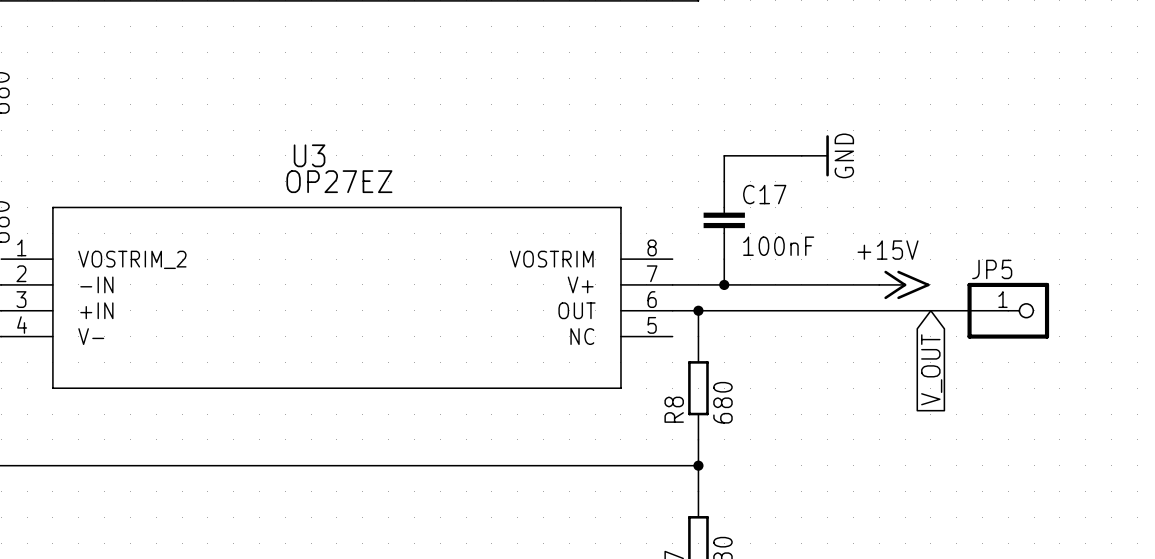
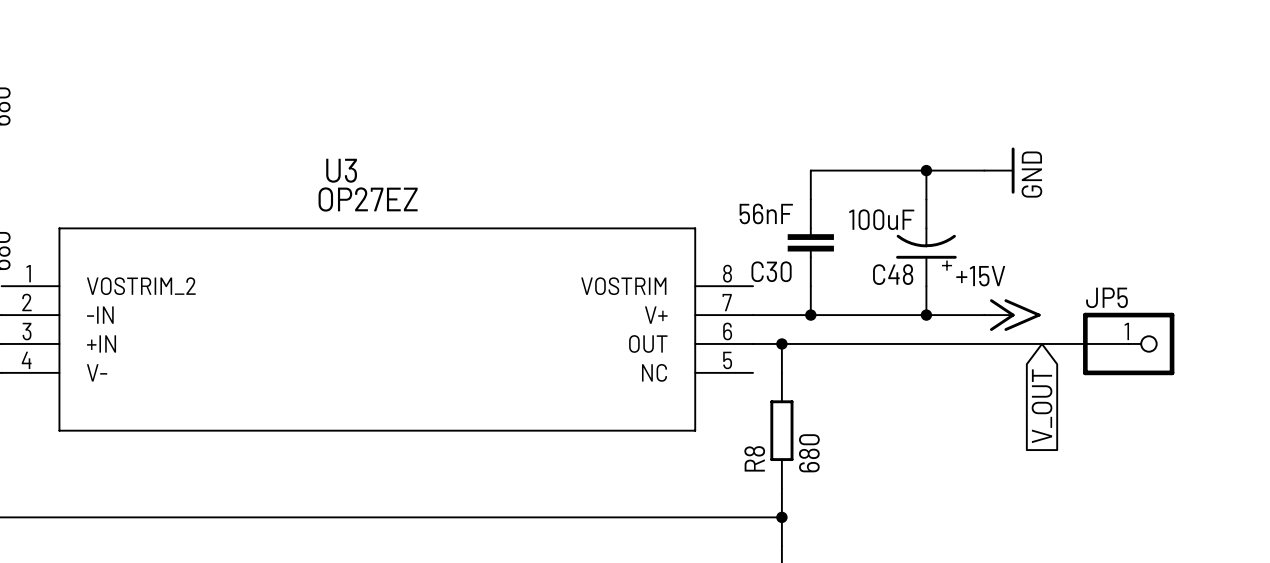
wire: none -> (897, 170) (984, 170)
power symbol position: GND (815, 155) -> GND (999, 170)
junction: none -> (926, 170)
C17 name: C17 (764, 194) -> C30 (771, 271)
C48: none -> 100uF (926, 242)
C17 value: 100nF (778, 246) -> 56nF (766, 213)
wire: none -> (926, 286) (926, 315)
junction: none -> (926, 315)

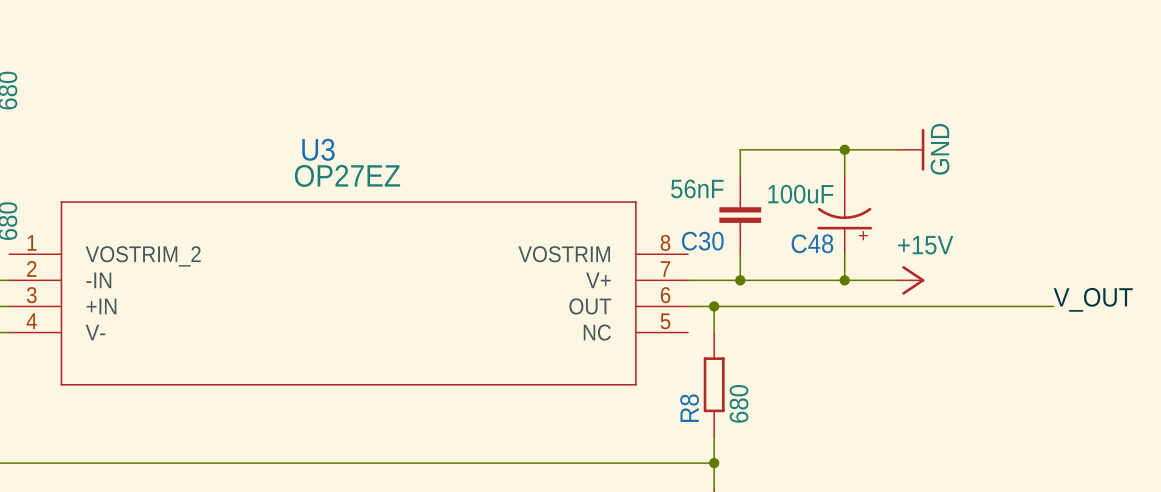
power symbol: none -> +15V (910, 280)
power symbol: +15V (1012, 315) -> none
label: none -> V_OUT (1093, 299)
wire: none -> (1027, 306) (1053, 306)
JP5: (1128, 343) -> none
global label: V_OUT (1042, 406) -> none

